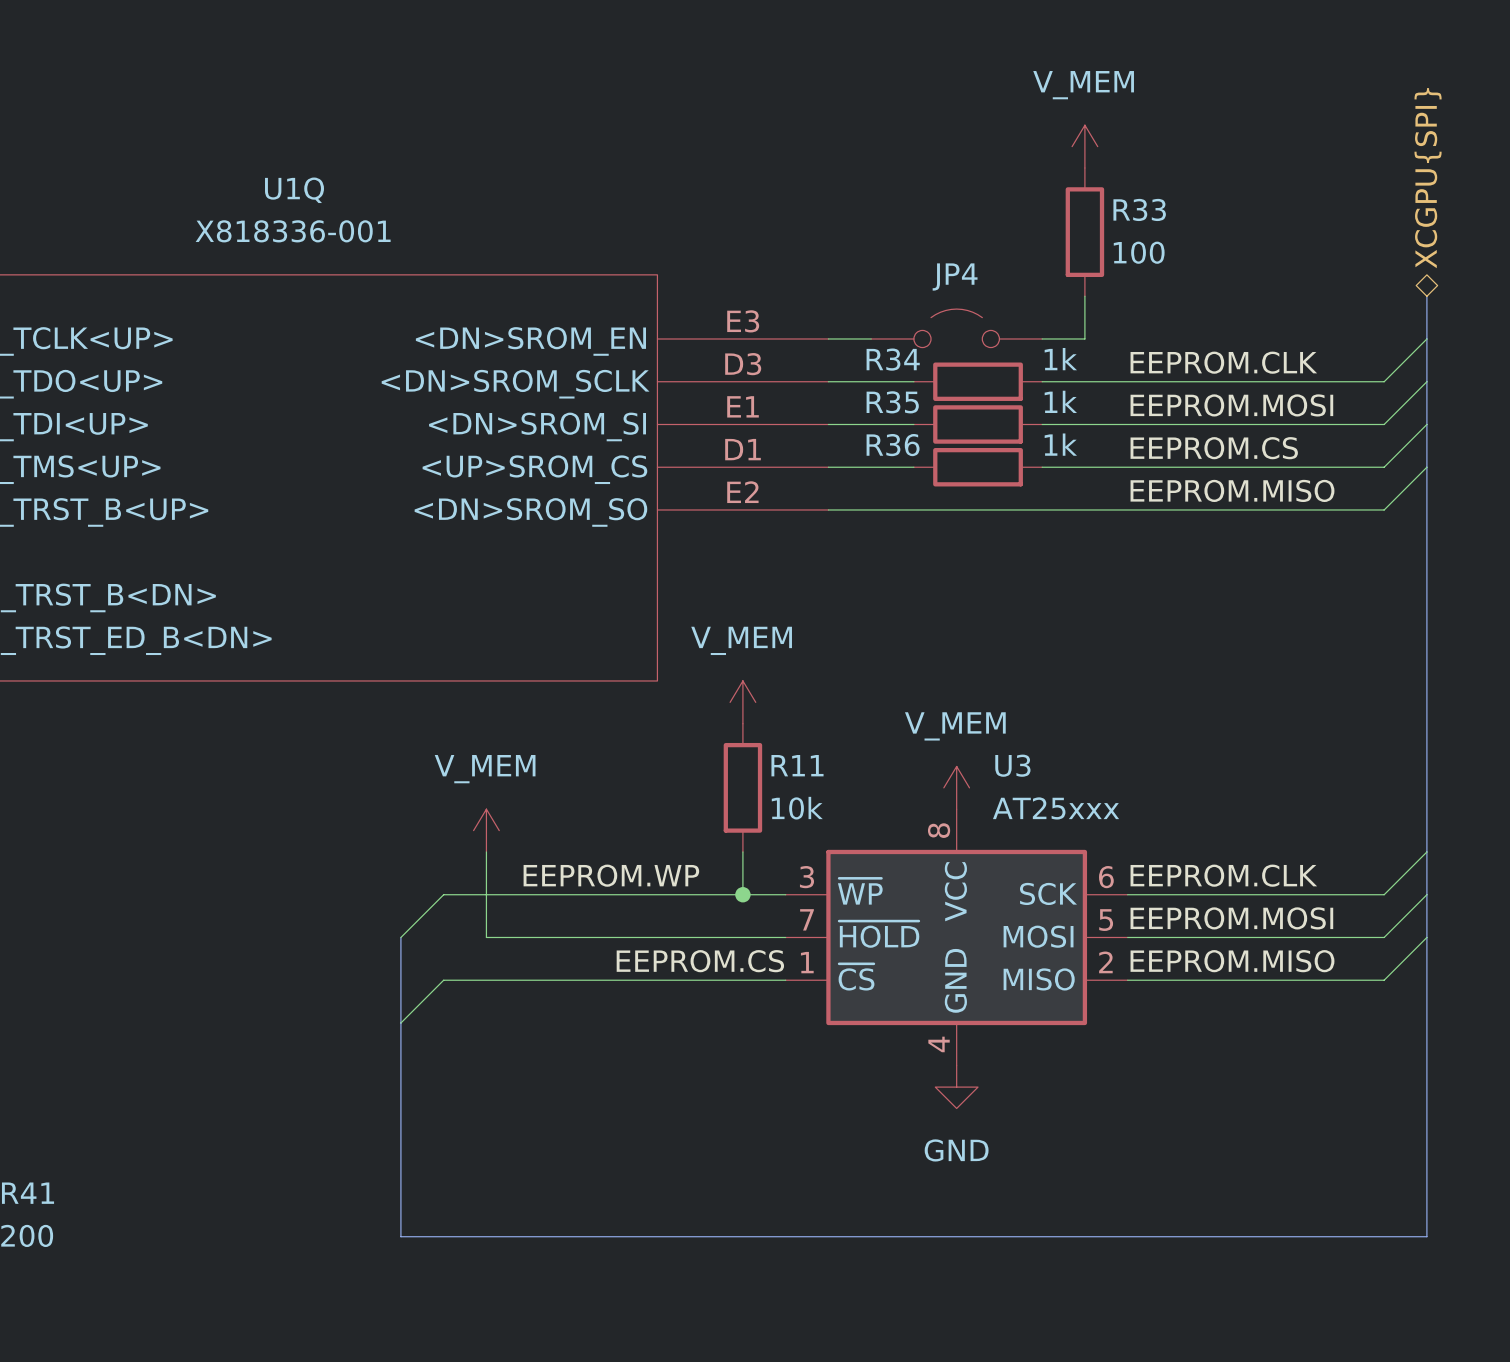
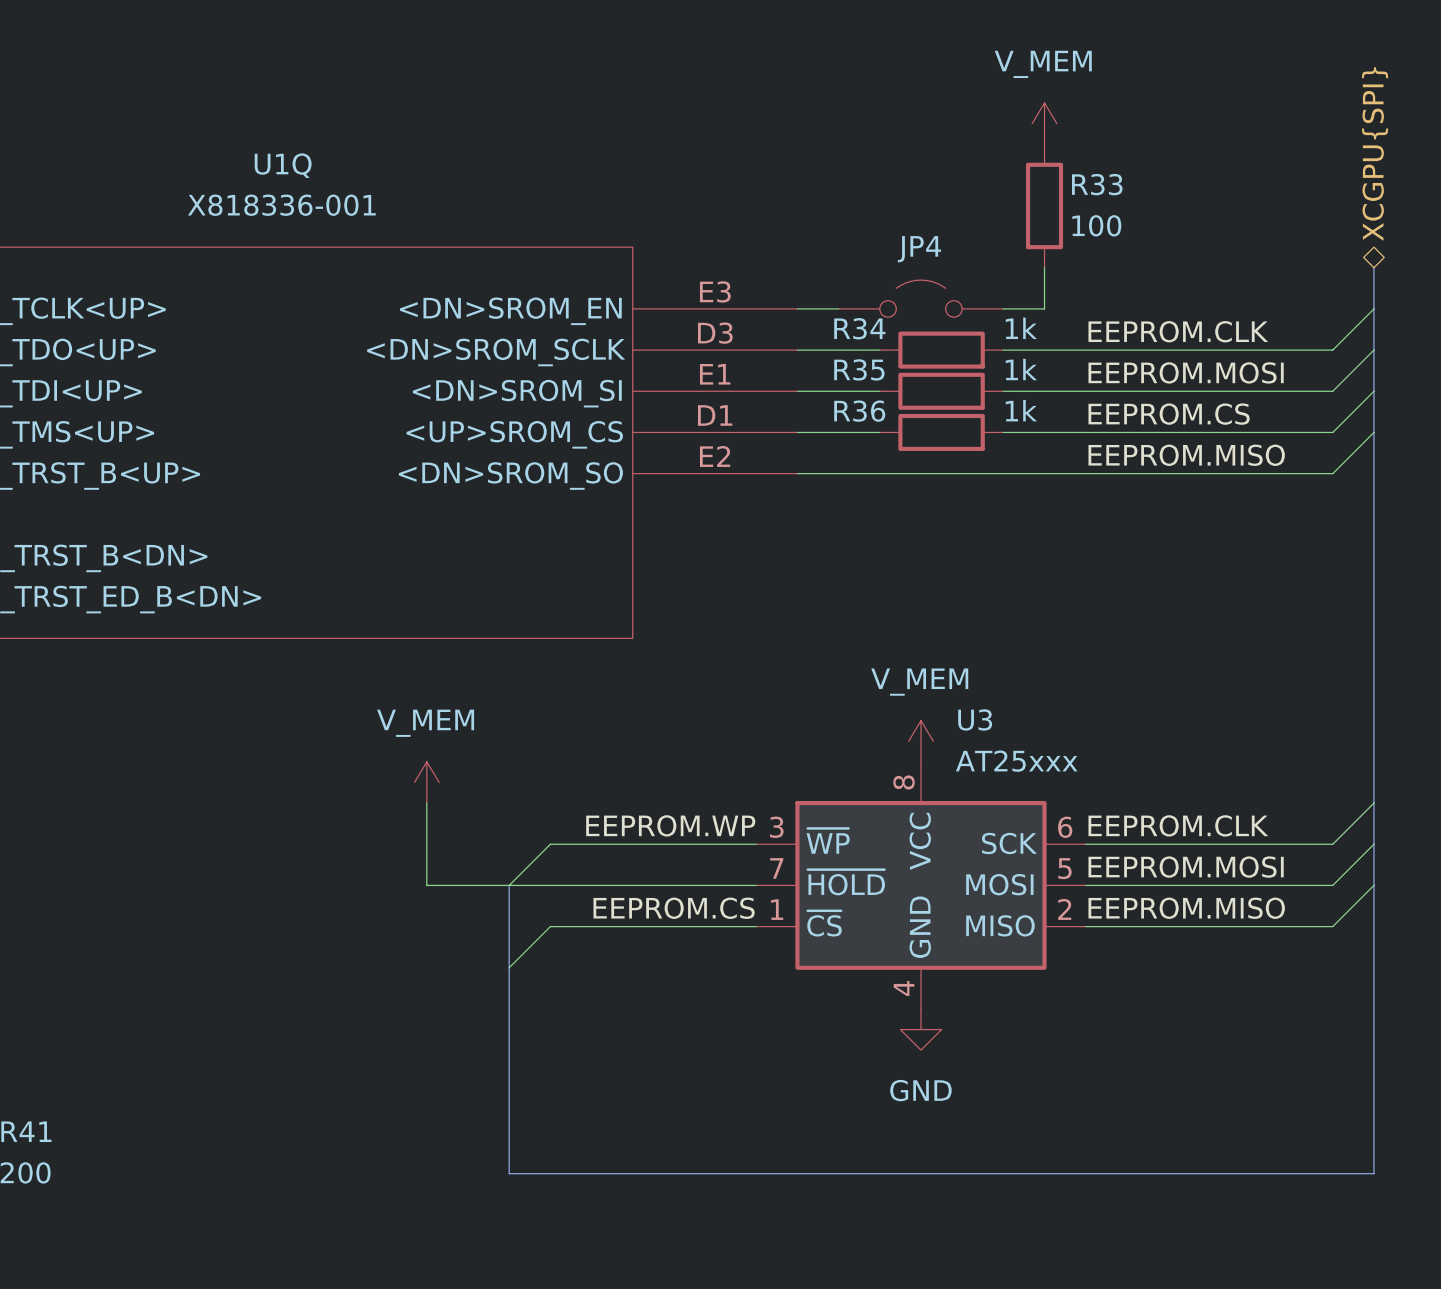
power symbol: V_MEM (742, 702) -> none
R11: 10k (742, 787) -> none
power symbol position: V_MEM (486, 830) -> V_MEM (426, 782)
wire: (486, 851) (486, 937) -> (426, 803) (426, 885) (468, 885)
wire: (742, 851) (742, 894) -> none
label position: EEPROM.WP (611, 875) -> EEPROM.WP (670, 825)
wire: (571, 894) (443, 894) (400, 937) -> (550, 844) (509, 885)
junction: (742, 894) -> none
bus: (400, 937) (400, 1236) (529, 1236) -> (509, 885) (509, 1173)
wire: (571, 980) (443, 980) (400, 1022) -> (550, 926) (509, 967)

